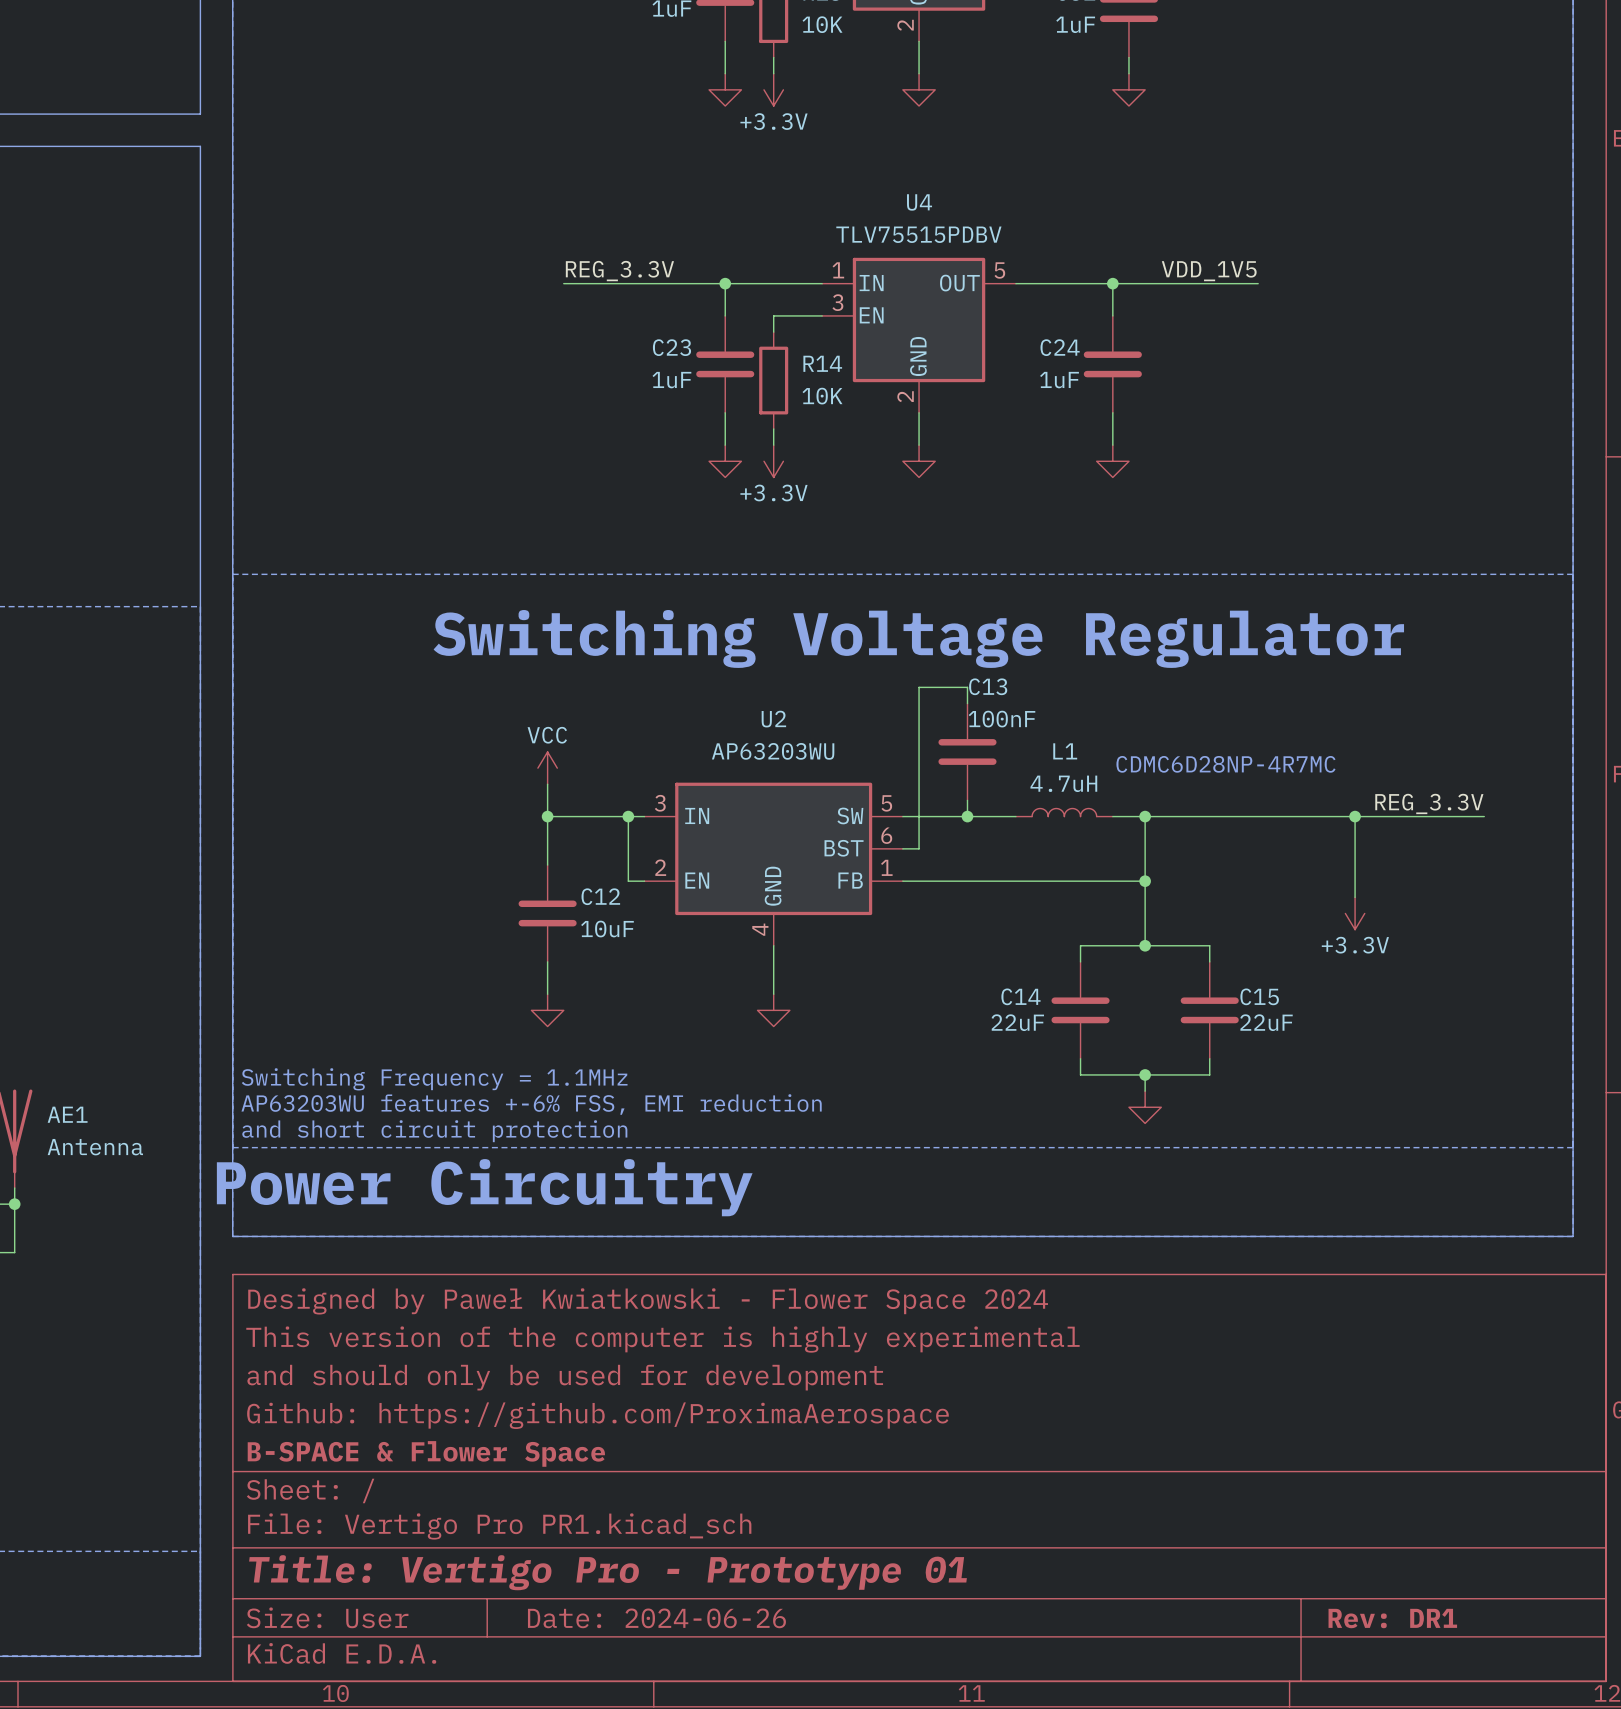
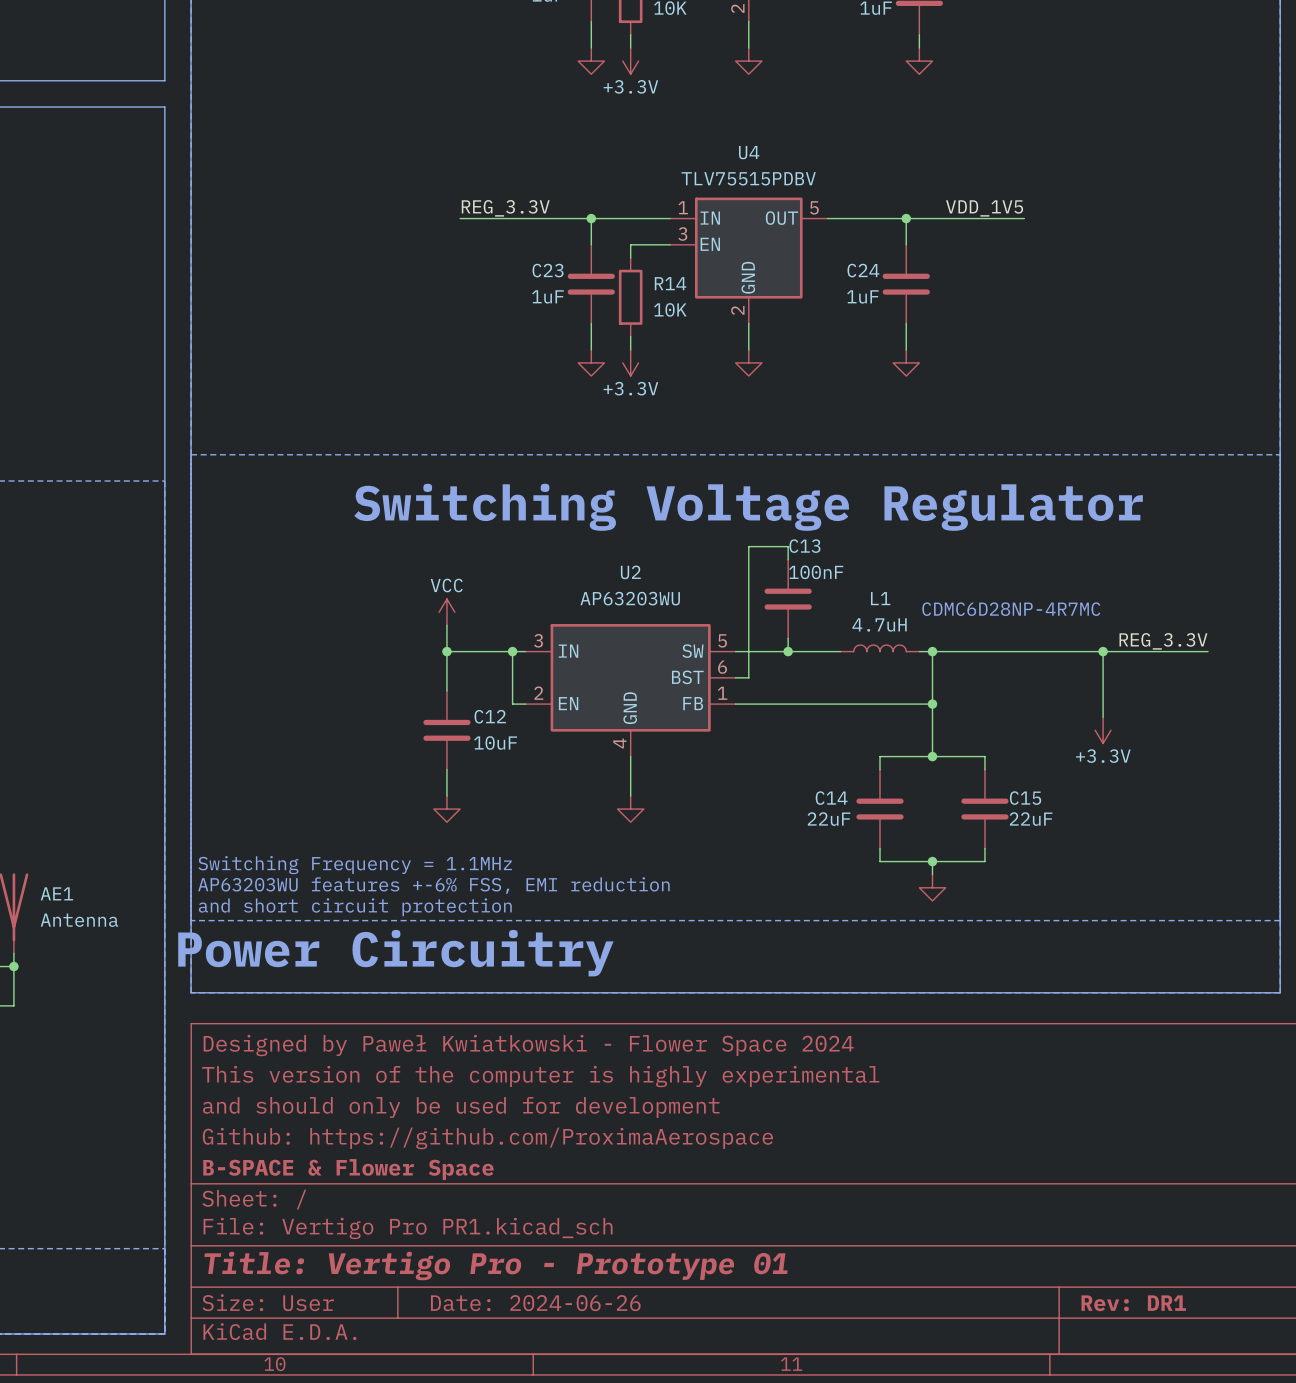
text position: CDMC6D28NP-4R7MC (1225, 764) -> CDMC6D28NP-4R7MC (1011, 609)
L1 position: (1064, 812) -> (880, 648)

